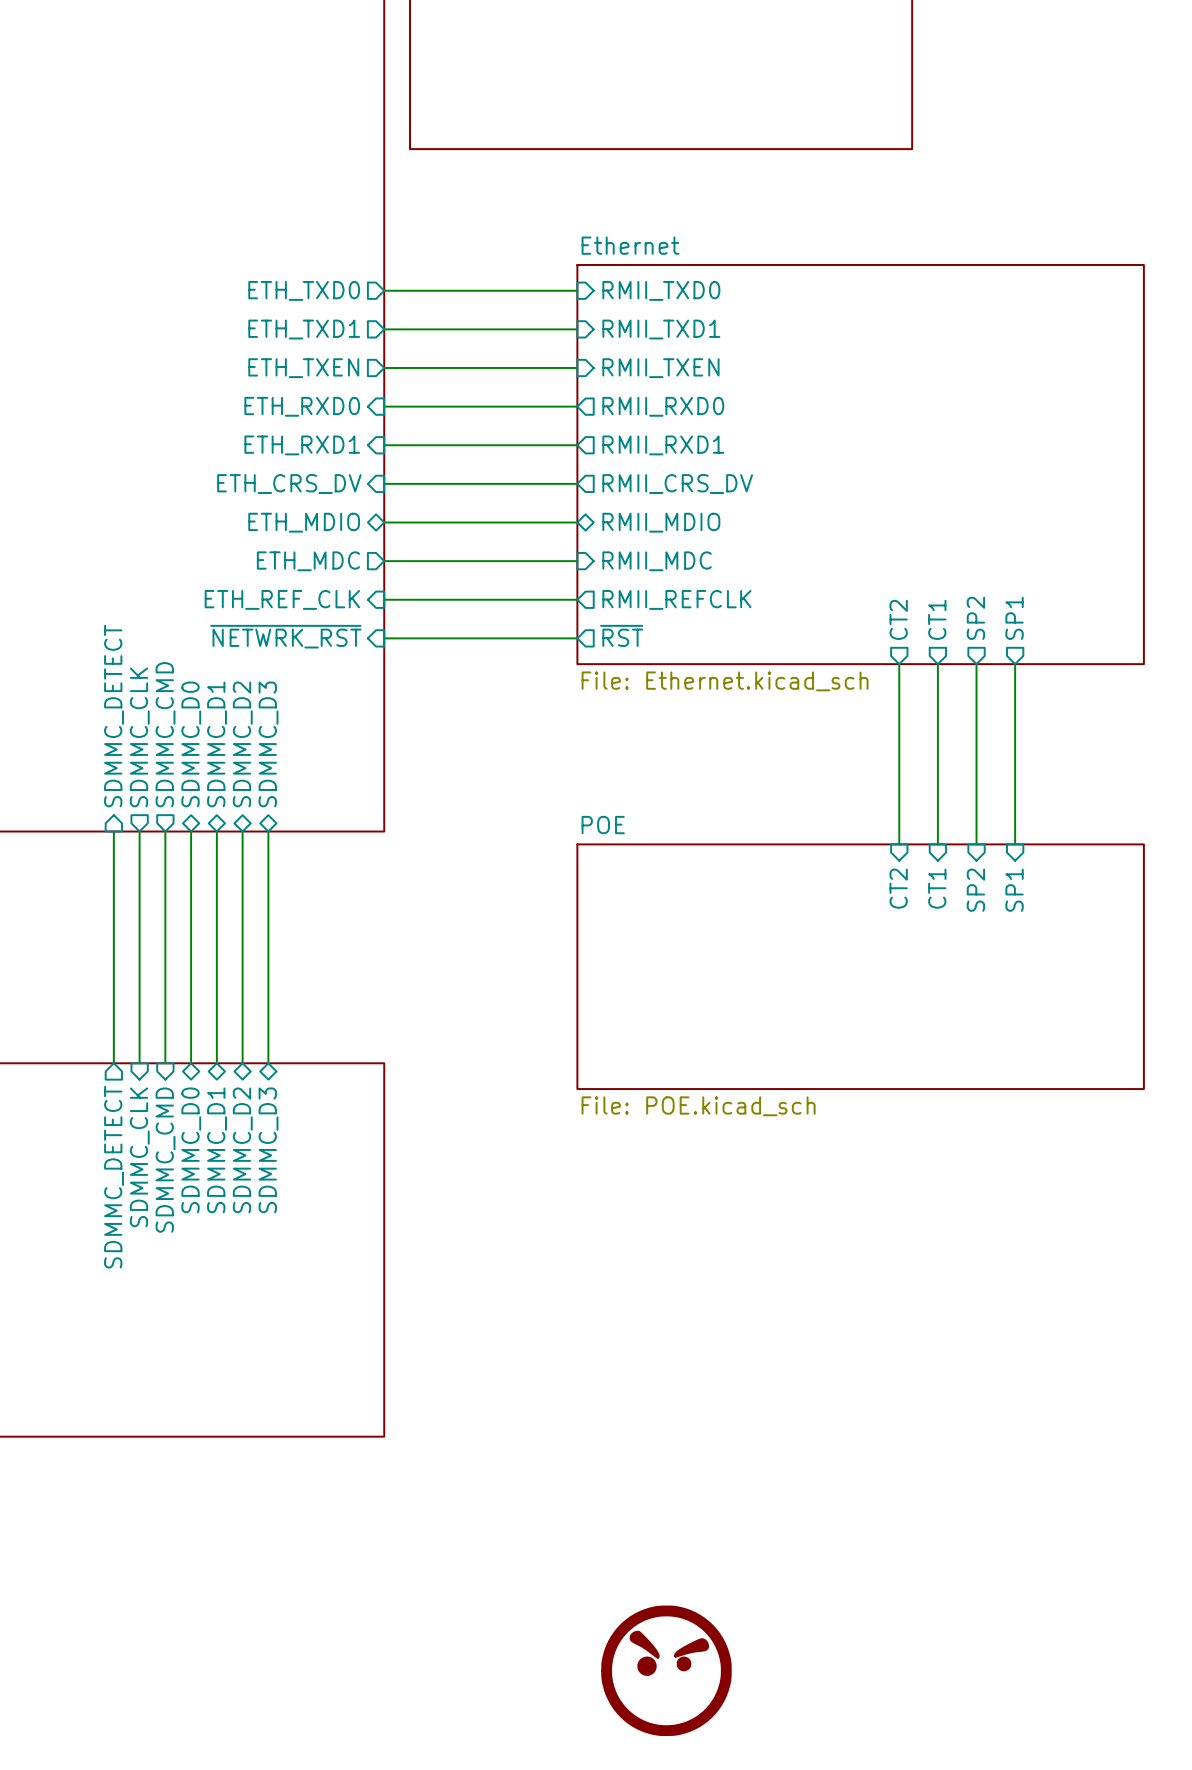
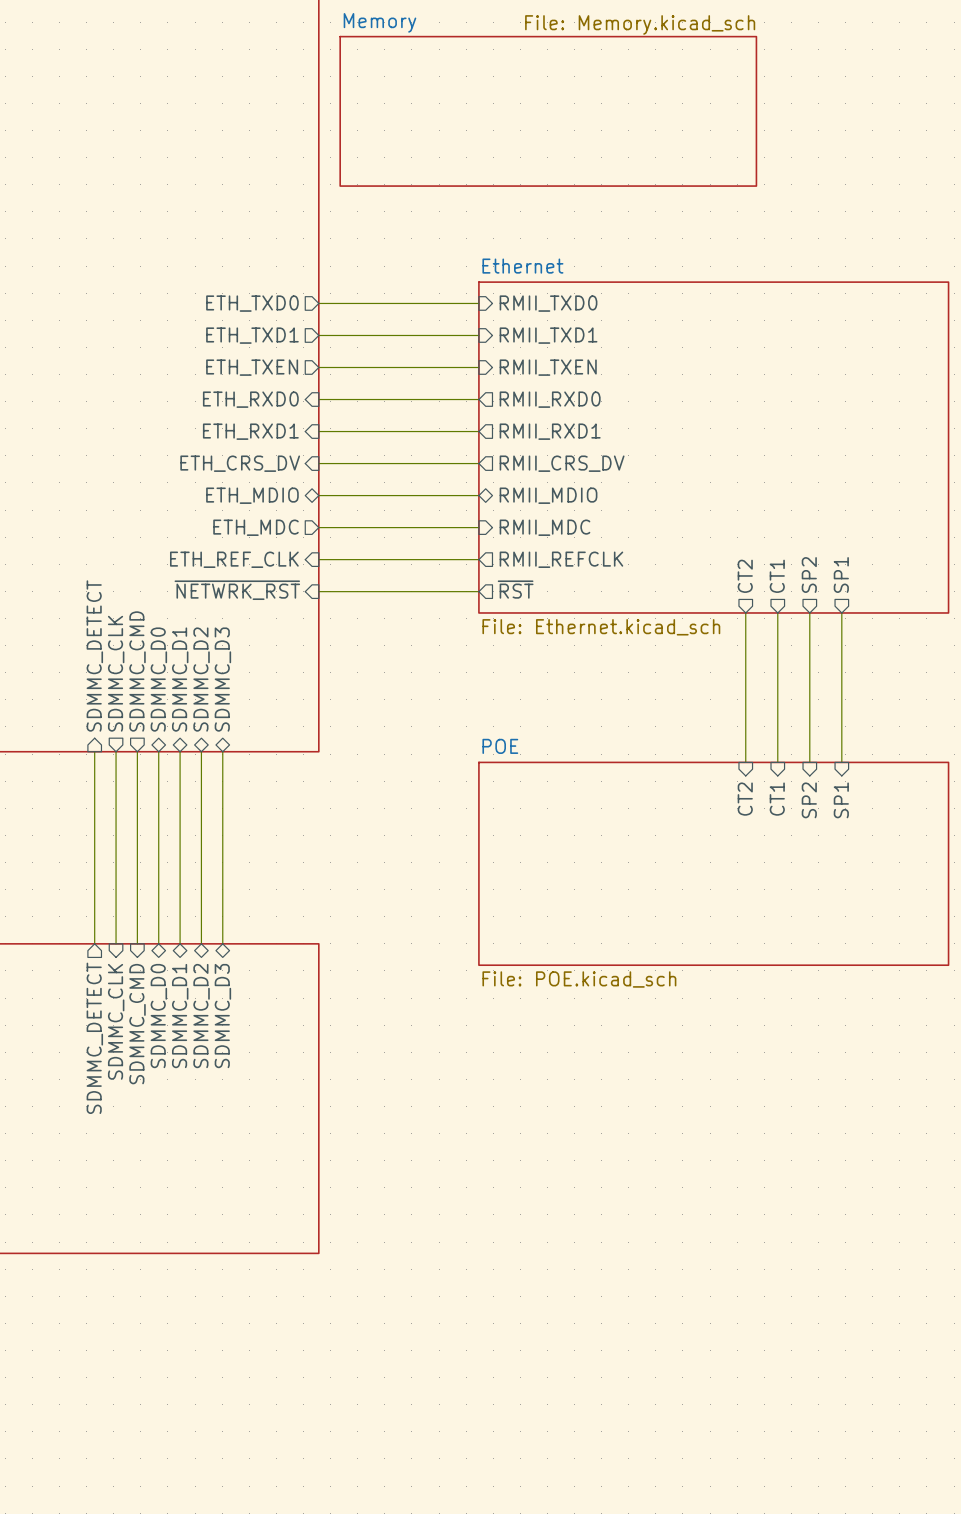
part: (666, 1670) -> none

